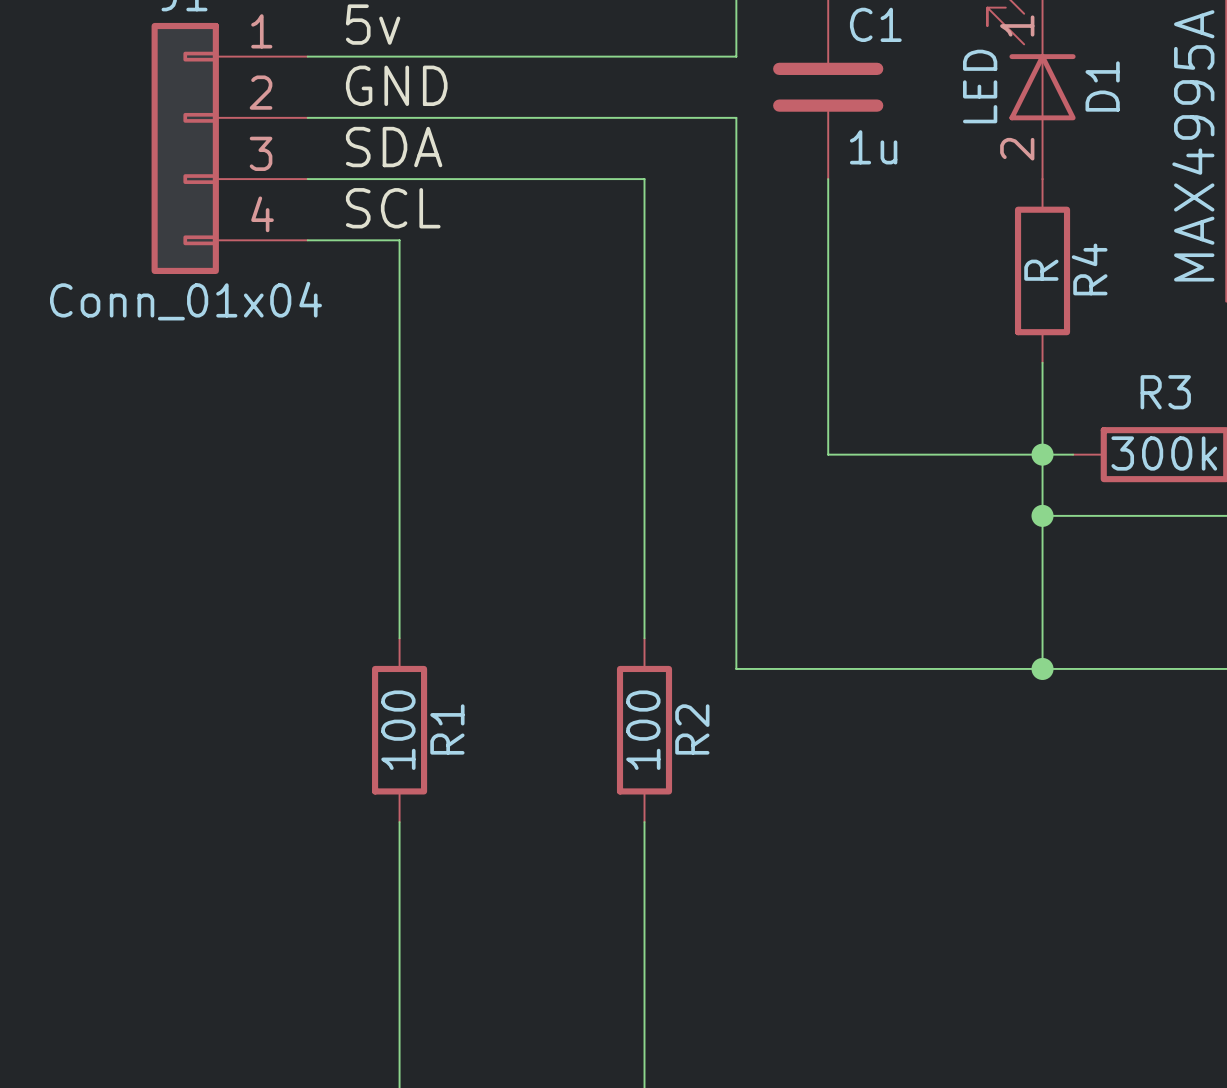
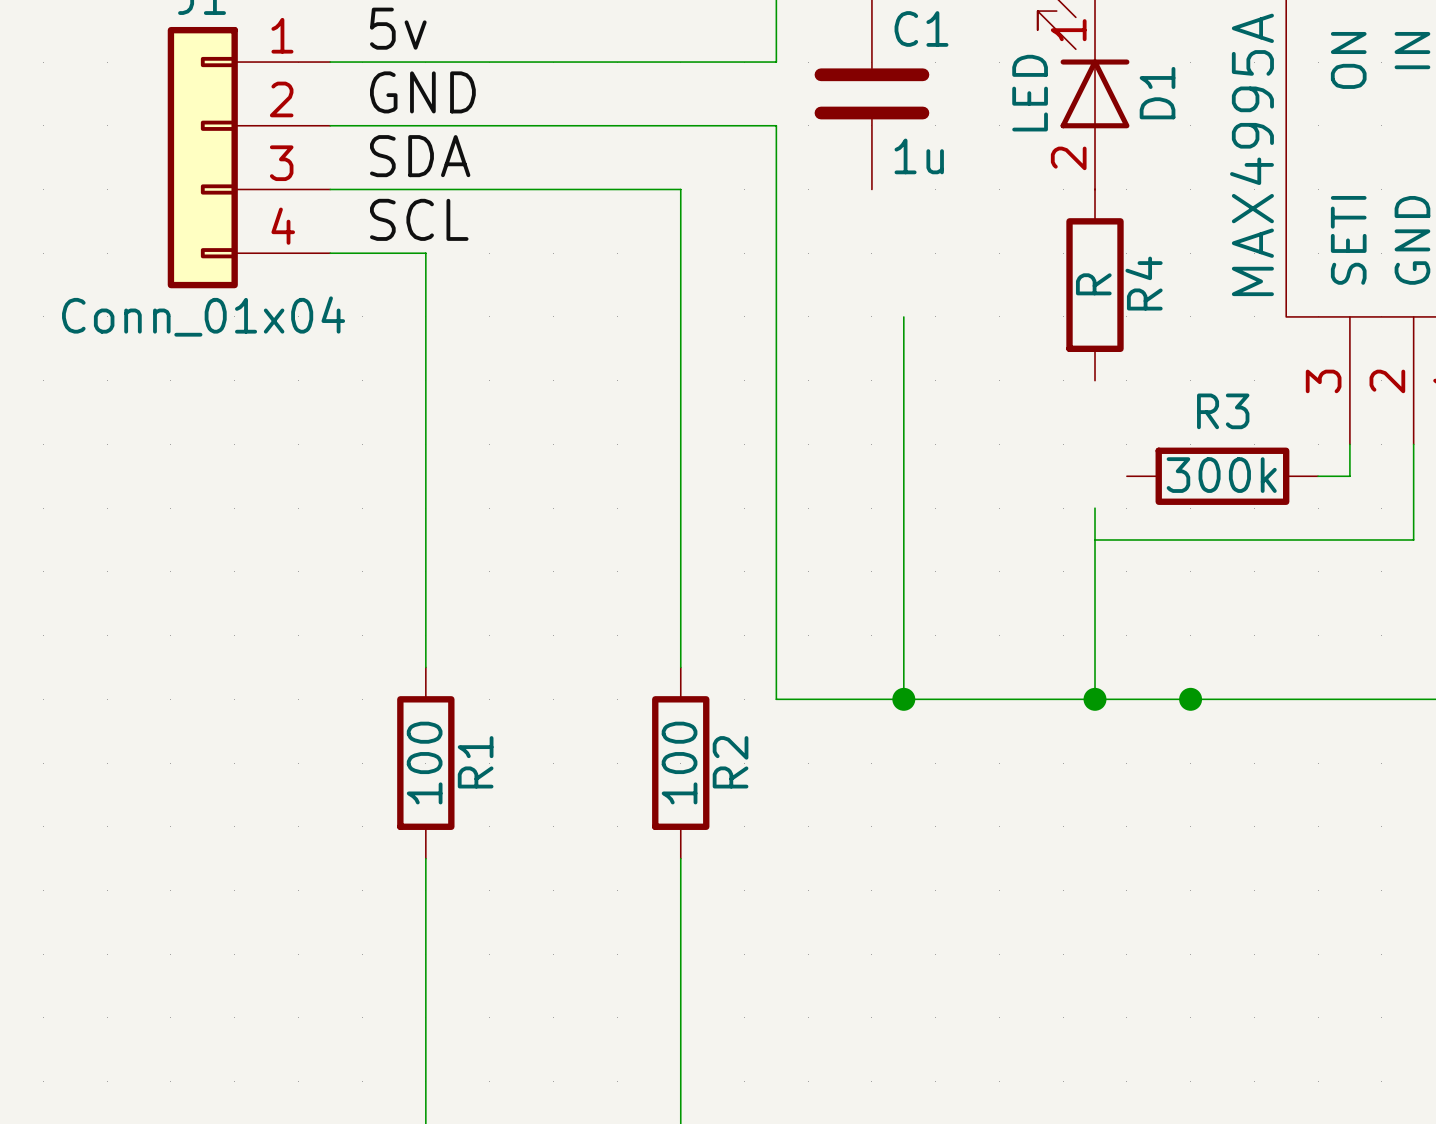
wire: (828, 179) (828, 454) (1073, 454) -> none
wire: none -> (903, 316) (903, 699)
wire: (1042, 362) (1042, 485) -> none
junction: (1042, 454) -> none
junction: (1042, 515) -> none
junction: none -> (903, 699)
junction: none -> (1190, 699)

